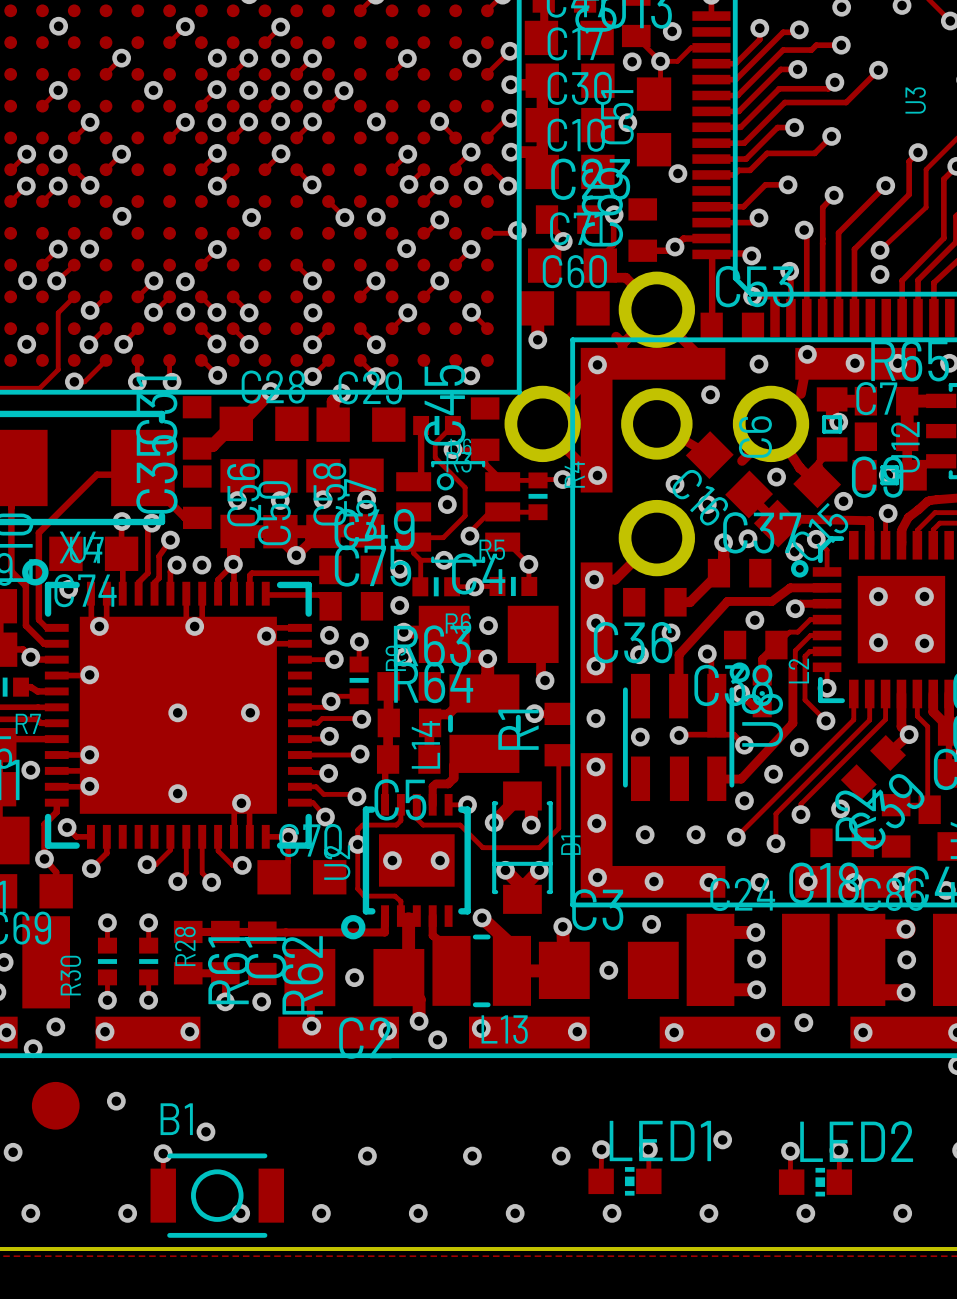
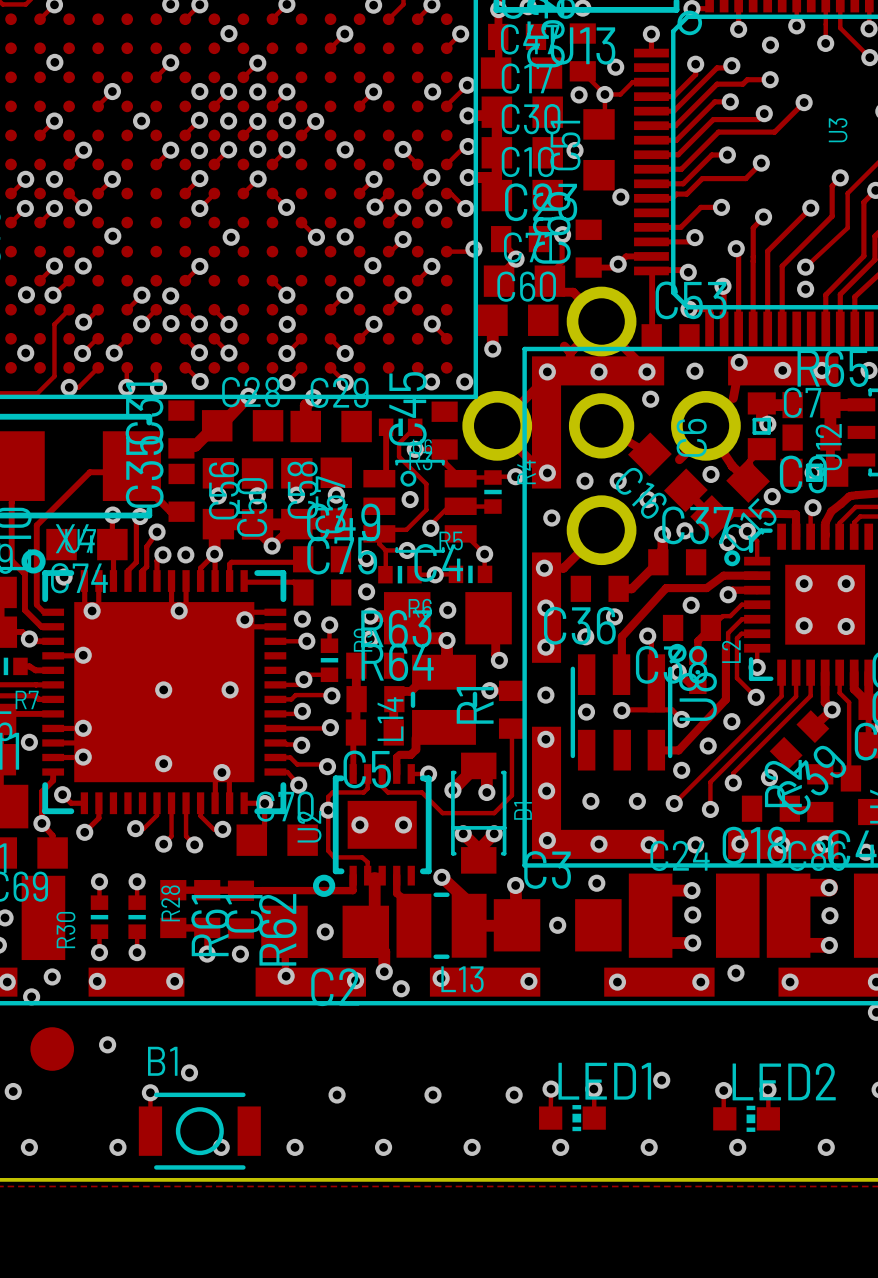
via: none -> (599, 371)
via: none -> (646, 371)
via: none -> (464, 381)
via: none -> (584, 481)
via: none -> (551, 518)

